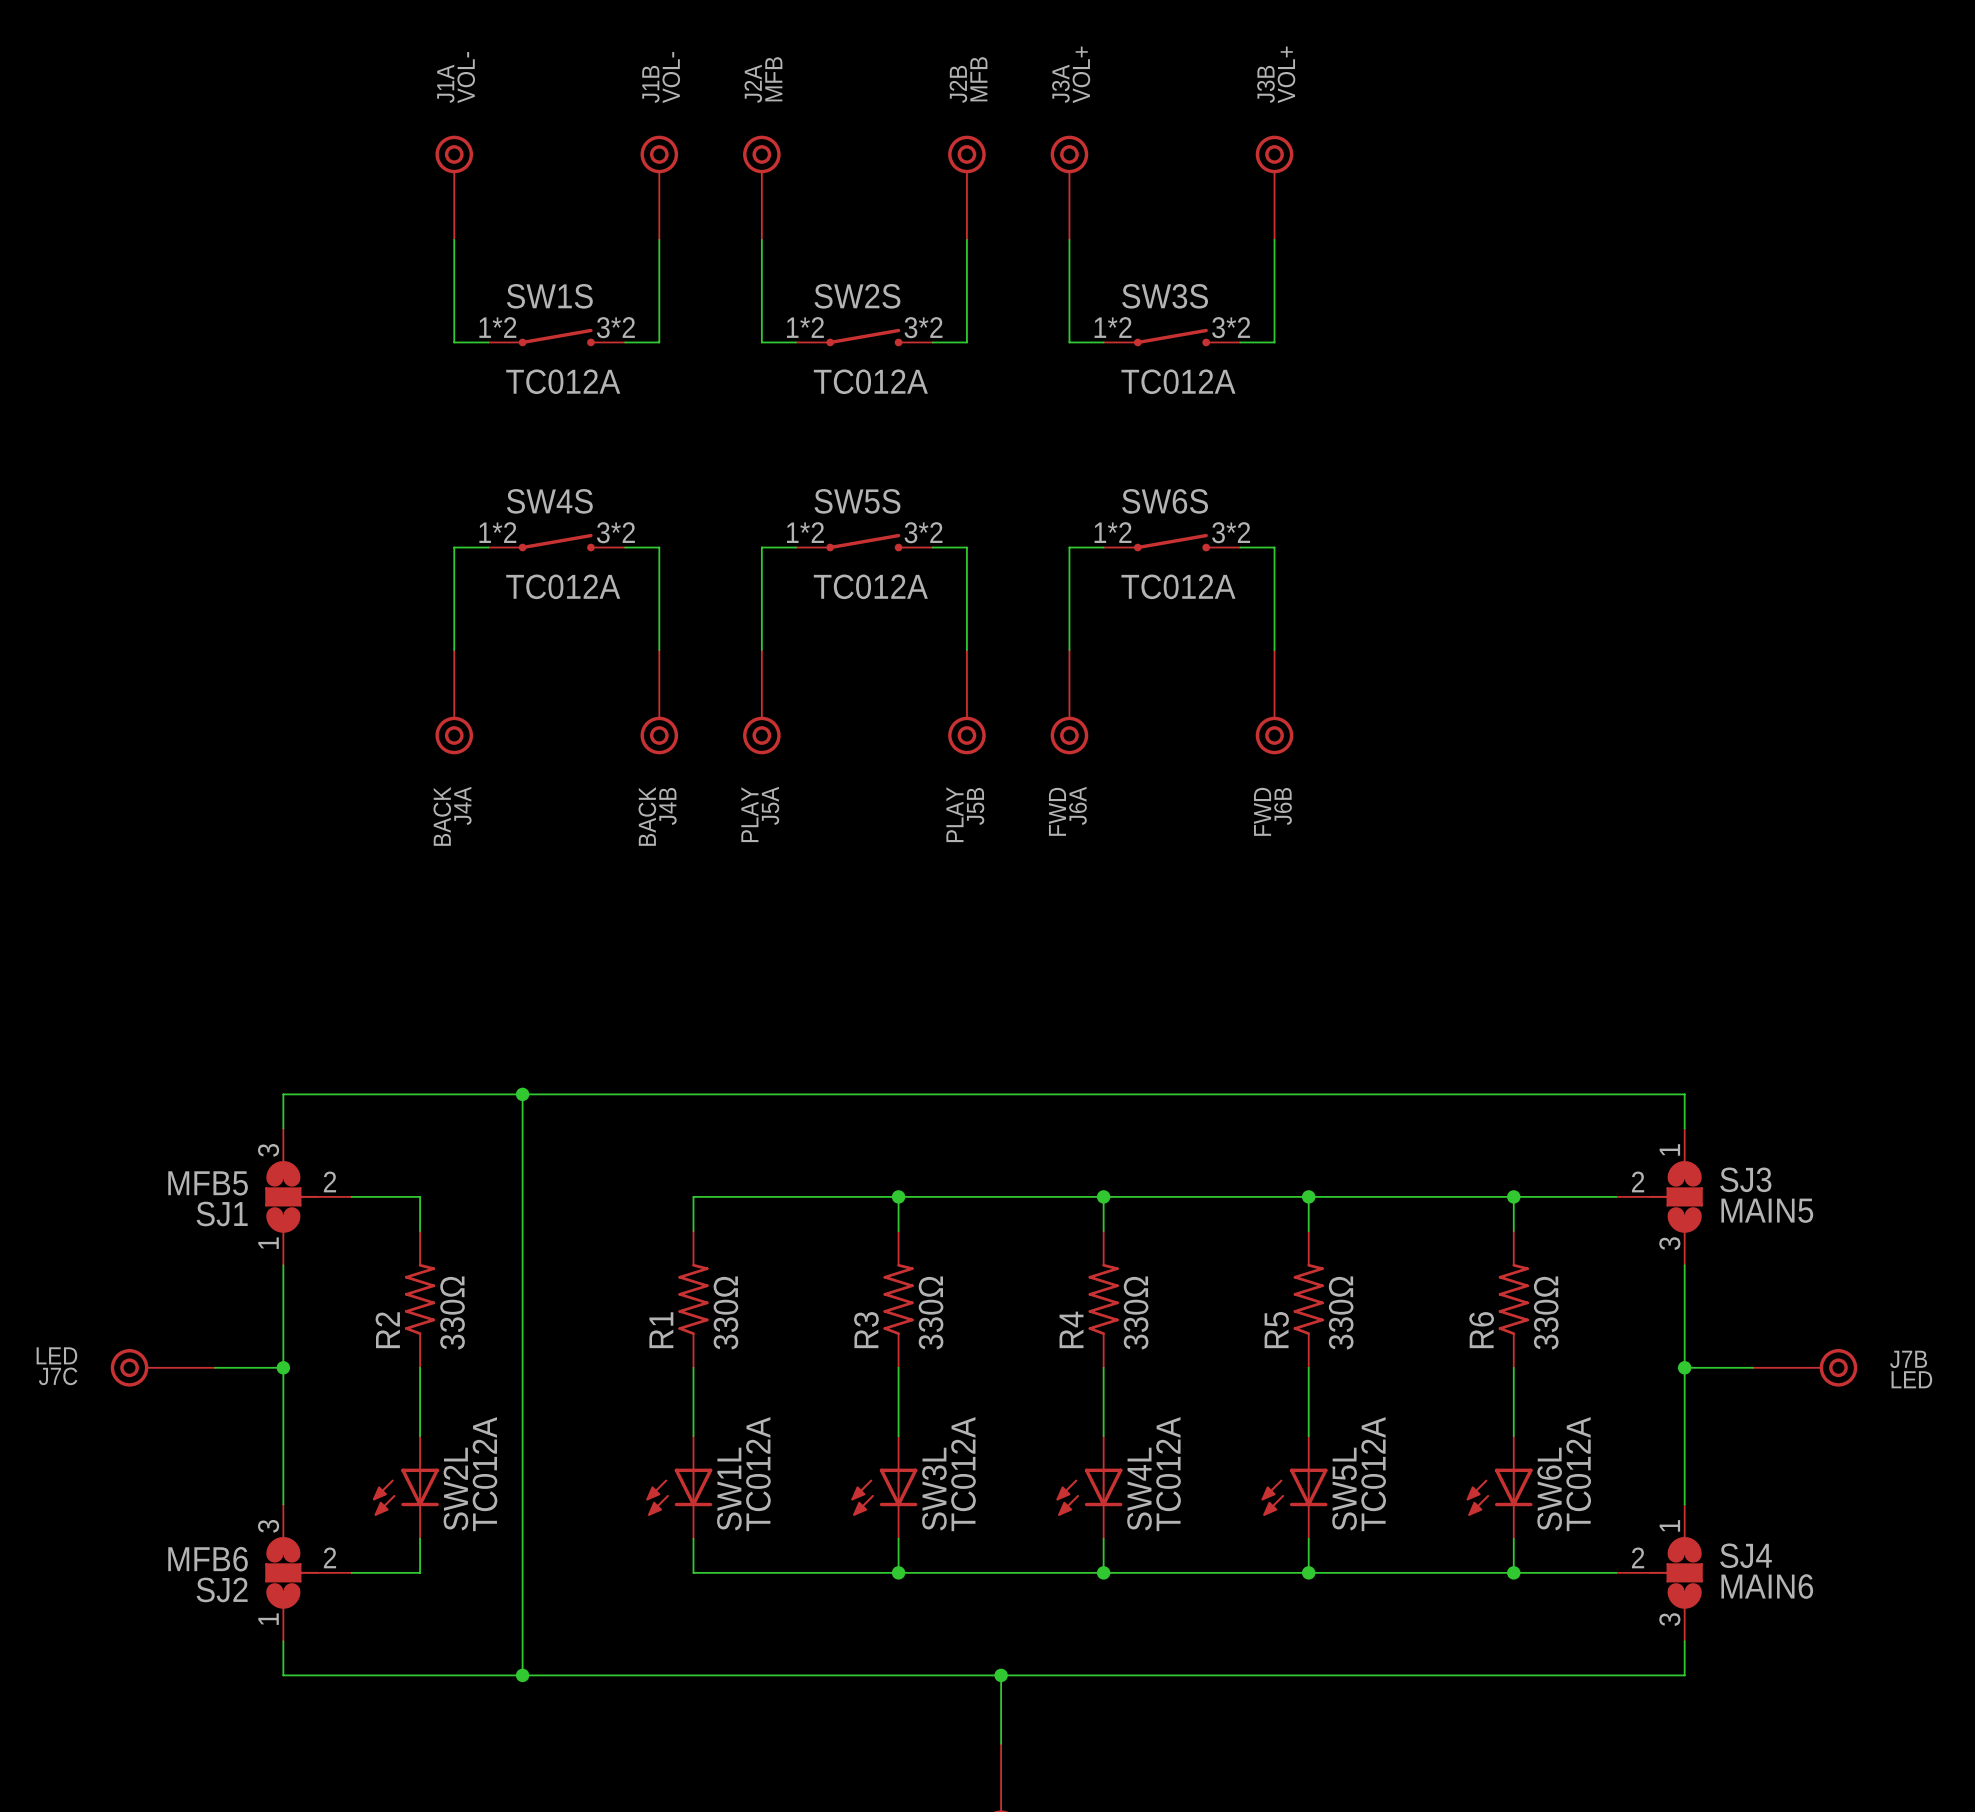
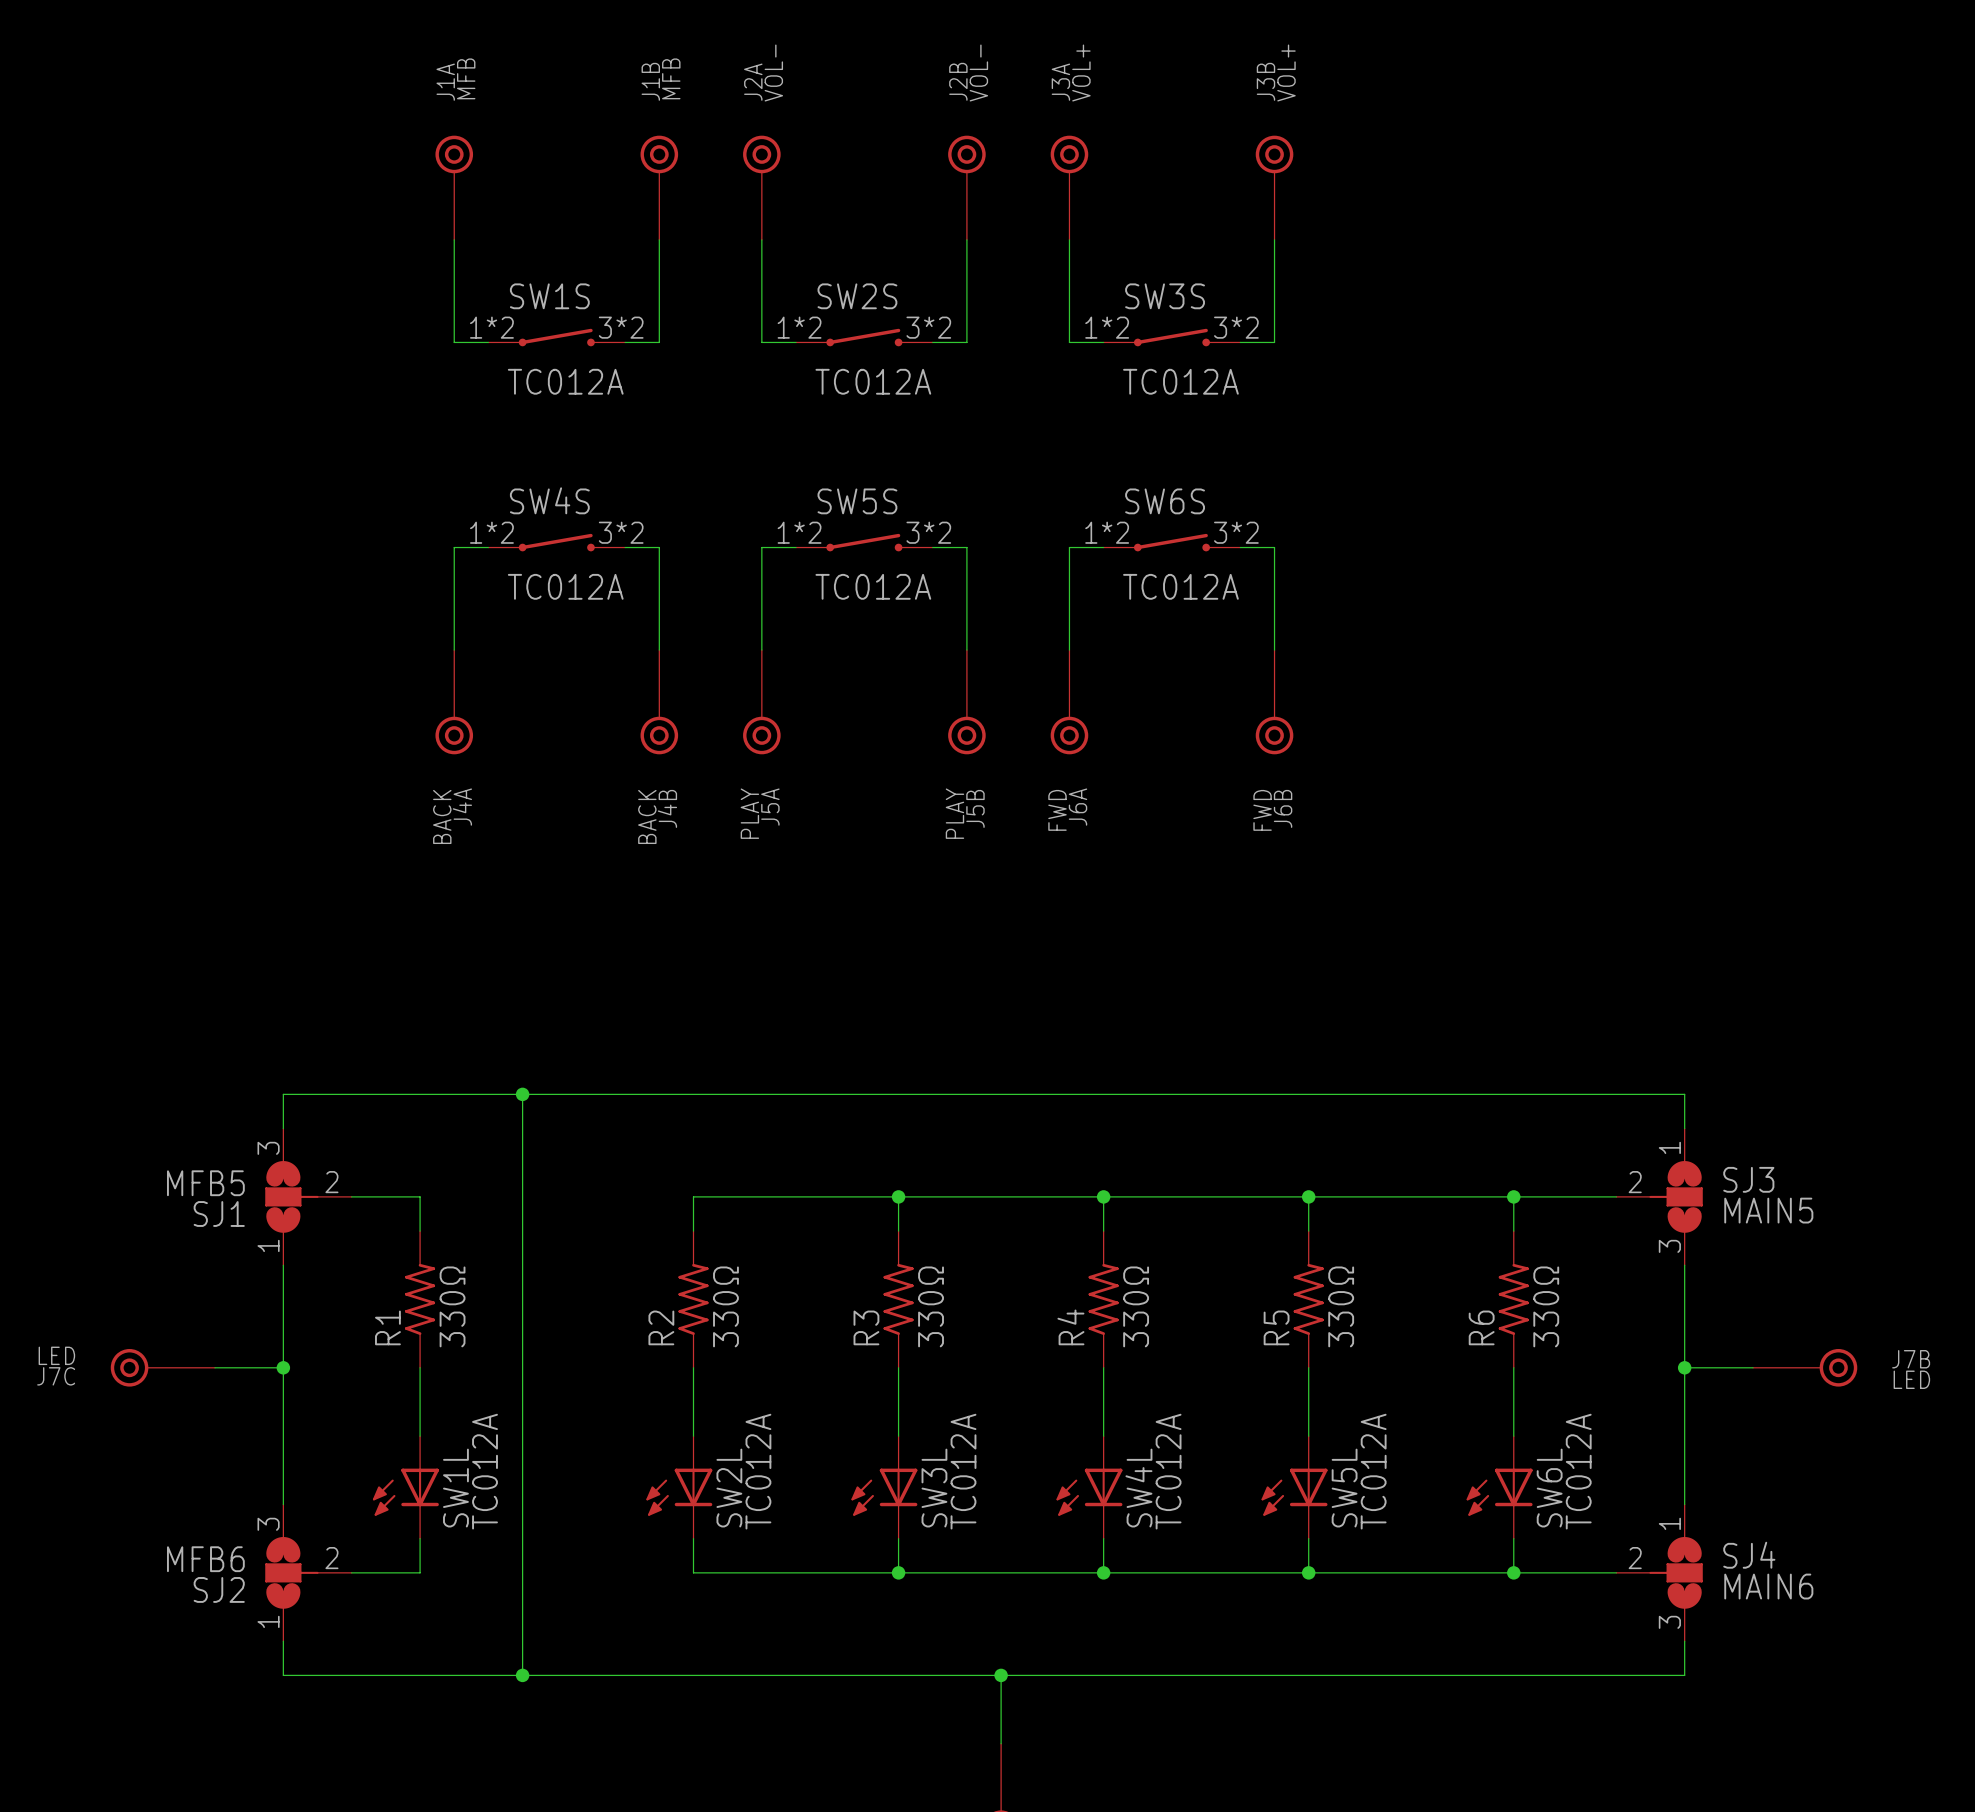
J1A value: VOL- (466, 77) -> MFB (466, 78)
J1B value: VOL- (671, 77) -> MFB (671, 78)
J2A value: MFB (773, 79) -> VOL- (773, 73)
J2B value: MFB (978, 79) -> VOL- (978, 73)
R2 name: R2 (387, 1330) -> R1 (387, 1327)
R1 name: R1 (661, 1330) -> R2 (661, 1327)
SW2L name: SW2L (455, 1489) -> SW1L (455, 1488)
SW1L name: SW1L (729, 1489) -> SW2L (729, 1488)

